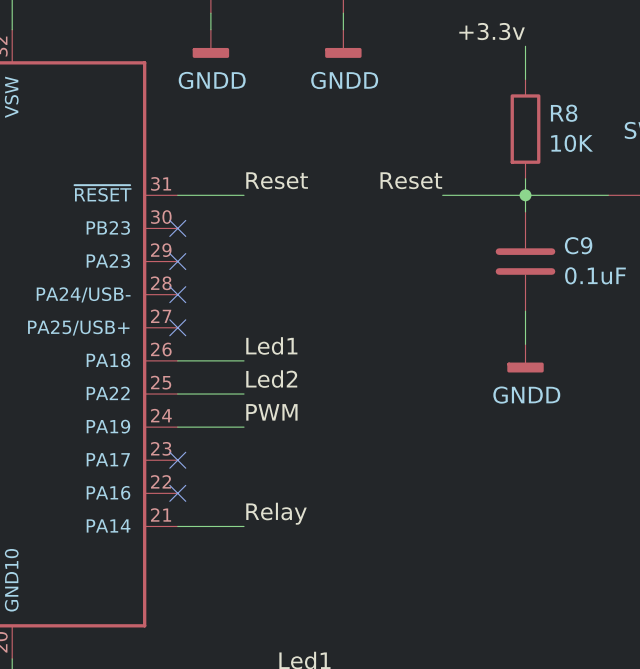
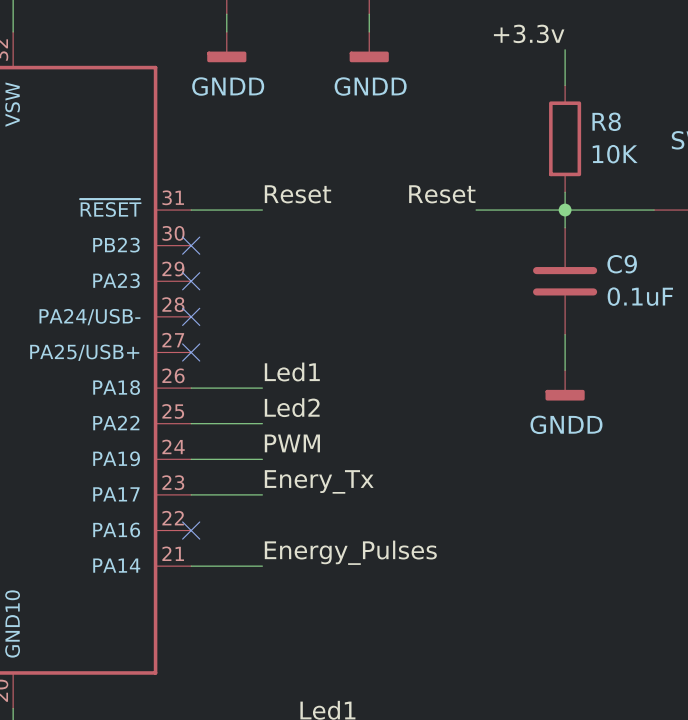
label: none -> Enery_Tx (319, 481)
wire: none -> (191, 494) (262, 494)
no-connect mark: (177, 460) -> none
label: Relay (276, 513) -> Energy_Pulses (350, 552)

